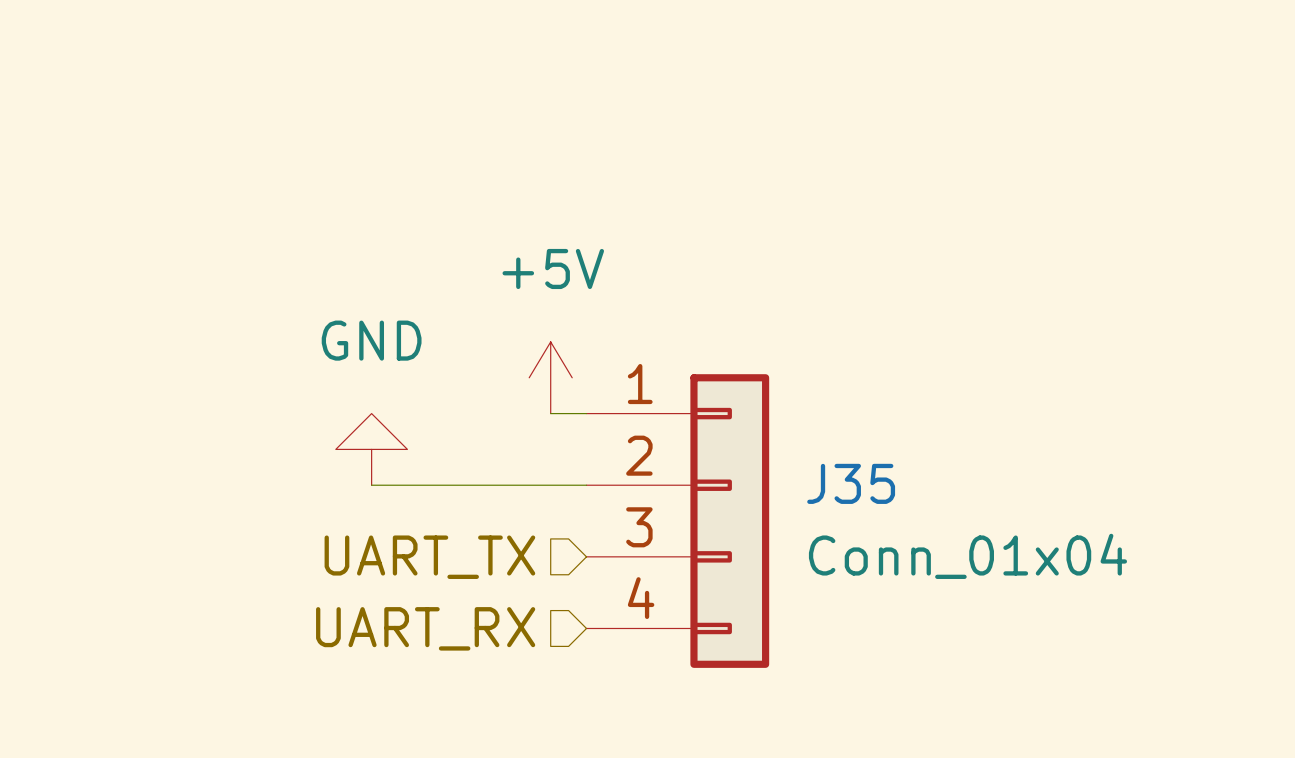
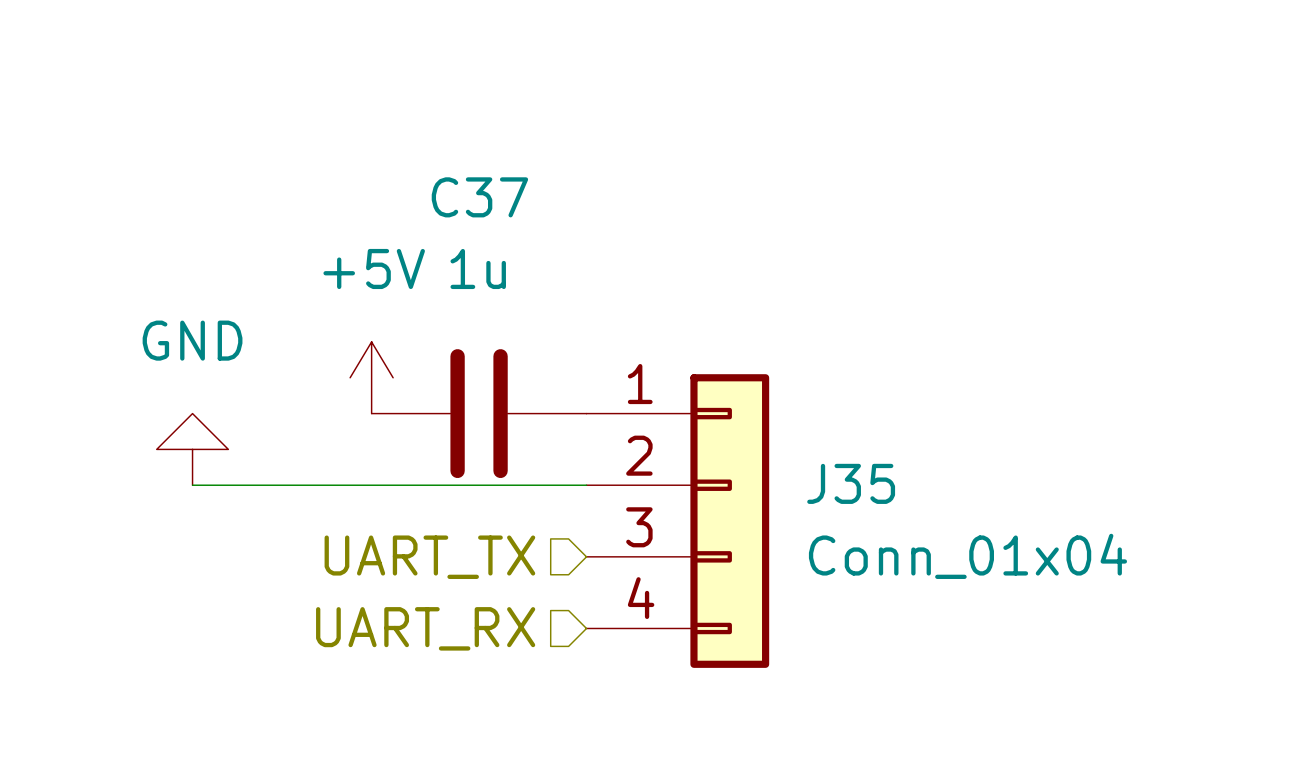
power symbol position: +5V (550, 377) -> +5V (371, 377)
C37: none -> 1u (479, 413)
power symbol position: GND (371, 449) -> GND (192, 449)
wire: none -> (192, 485) (371, 485)

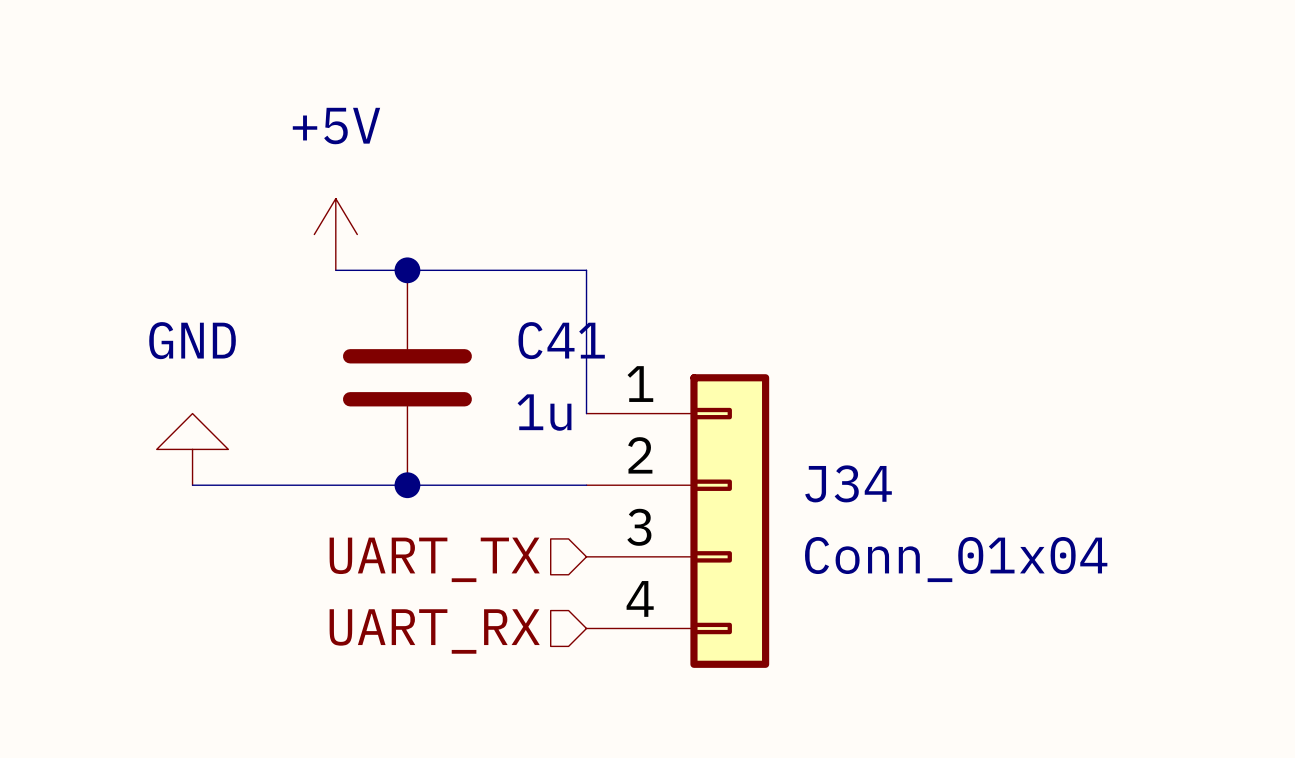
wire: none -> (335, 270) (586, 270) (586, 413)
junction: none -> (407, 270)
power symbol position: +5V (371, 377) -> +5V (335, 234)
C41: none -> 1u (407, 377)
C37: 1u (479, 413) -> none
J35 name: J35 (851, 483) -> J34 (848, 483)
junction: none -> (407, 485)

